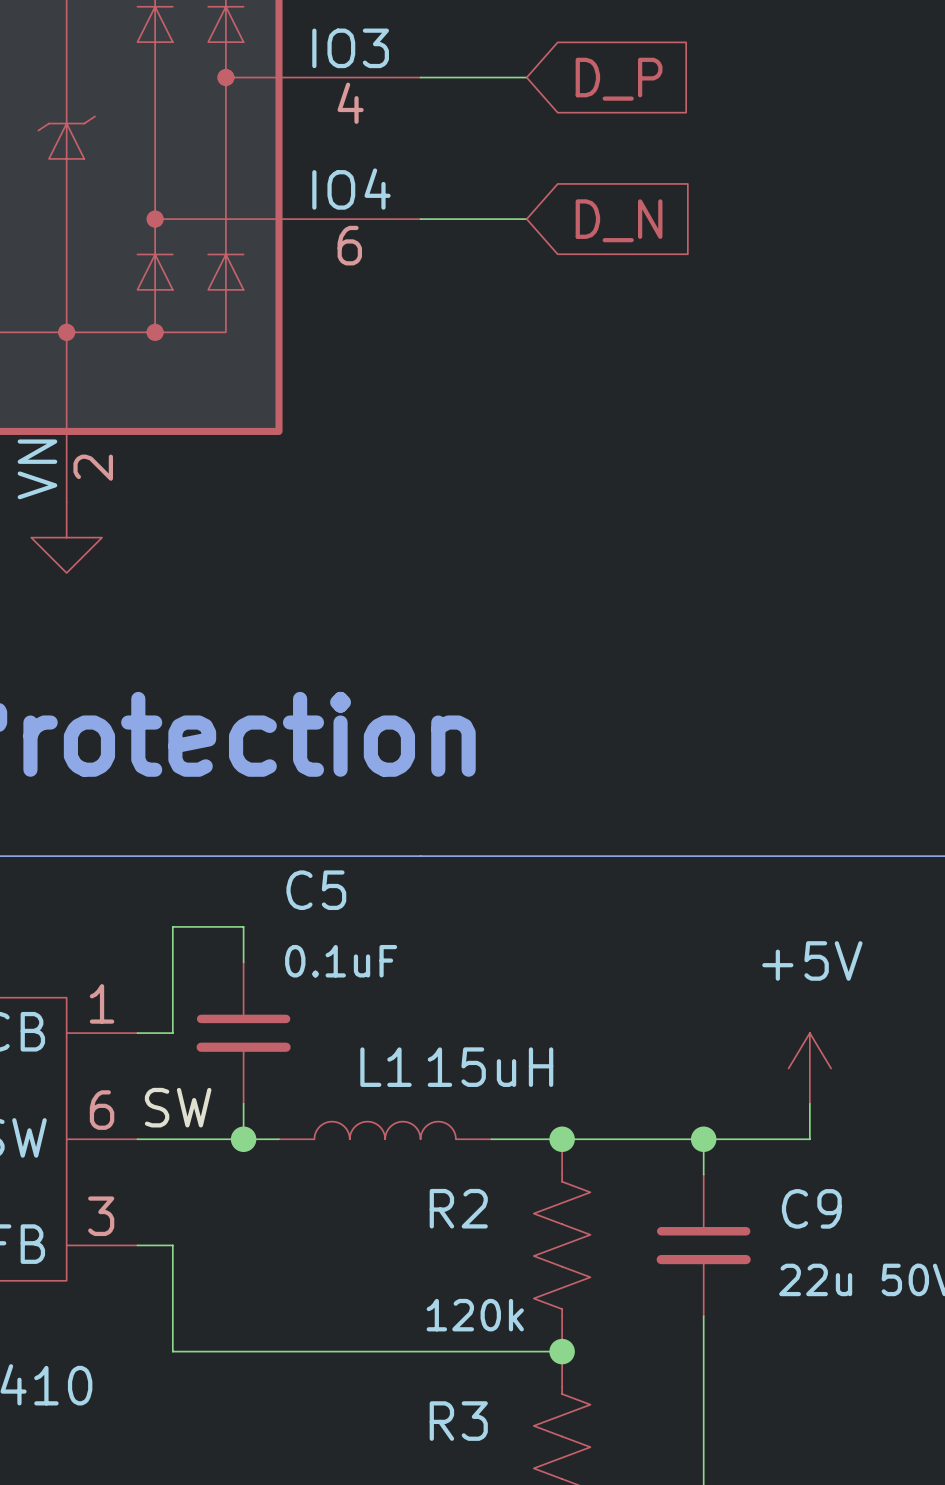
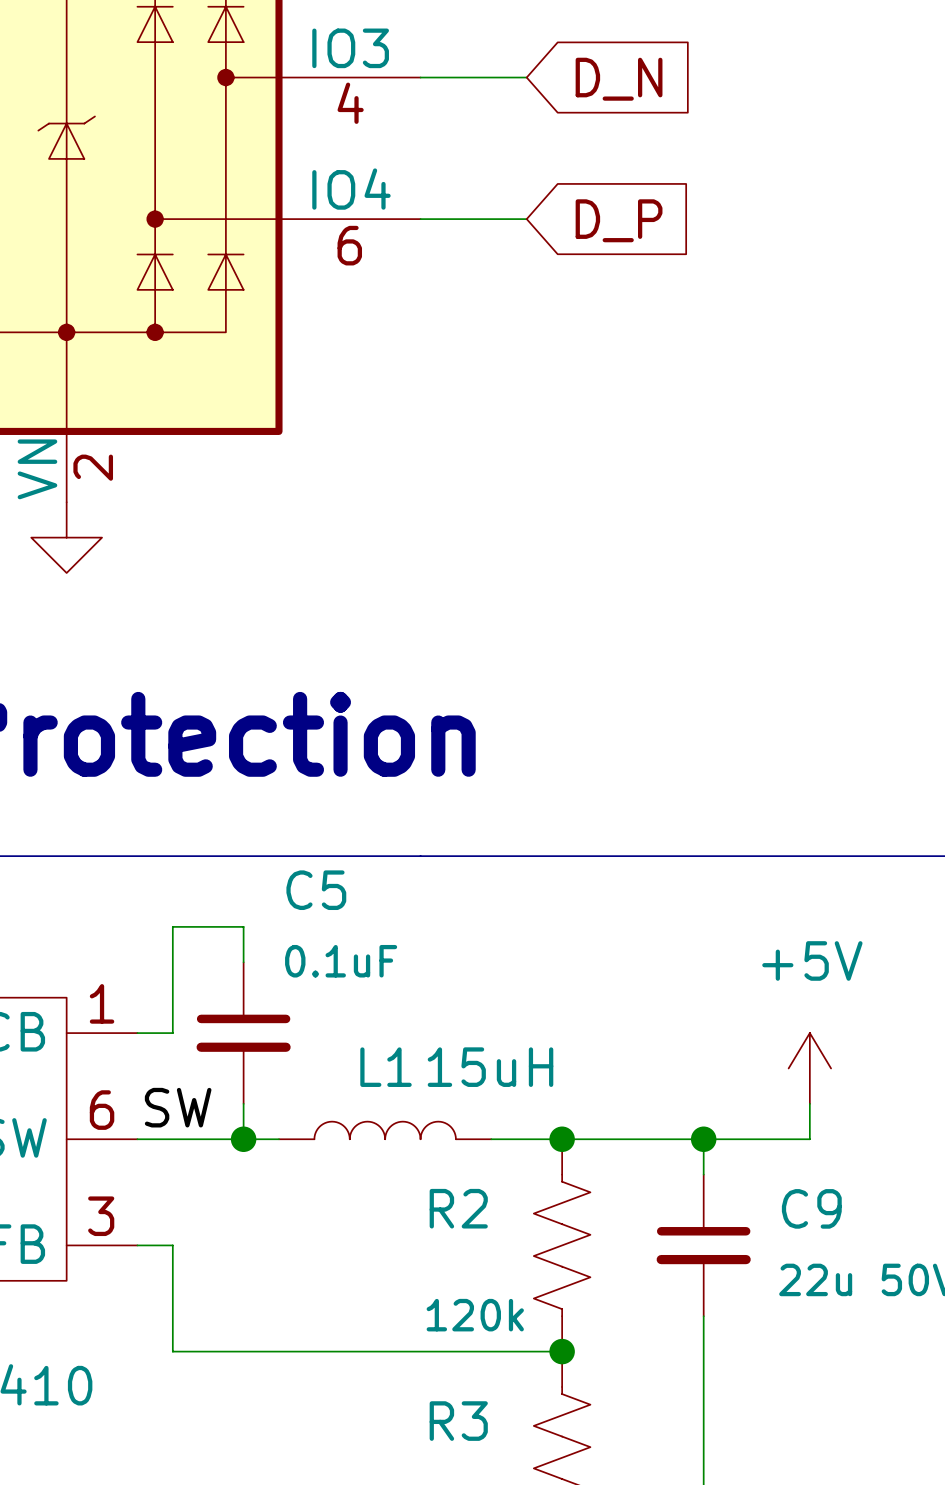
global label: D_P (619, 79) -> D_N (619, 79)
global label: D_N (619, 220) -> D_P (619, 220)

